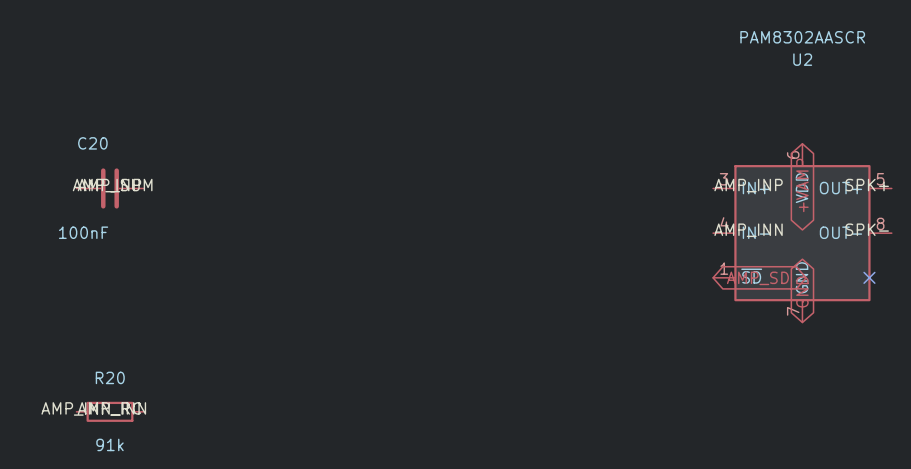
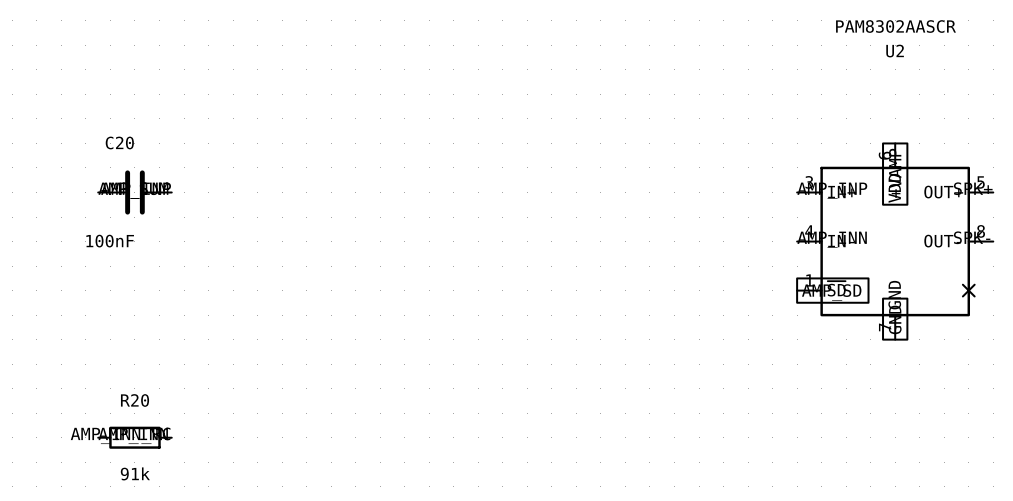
global label shape: bidirectional (802, 185) -> passive (895, 173)
global label shape: bidirectional (757, 278) -> passive (831, 292)
global label shape: bidirectional (802, 292) -> passive (895, 319)

